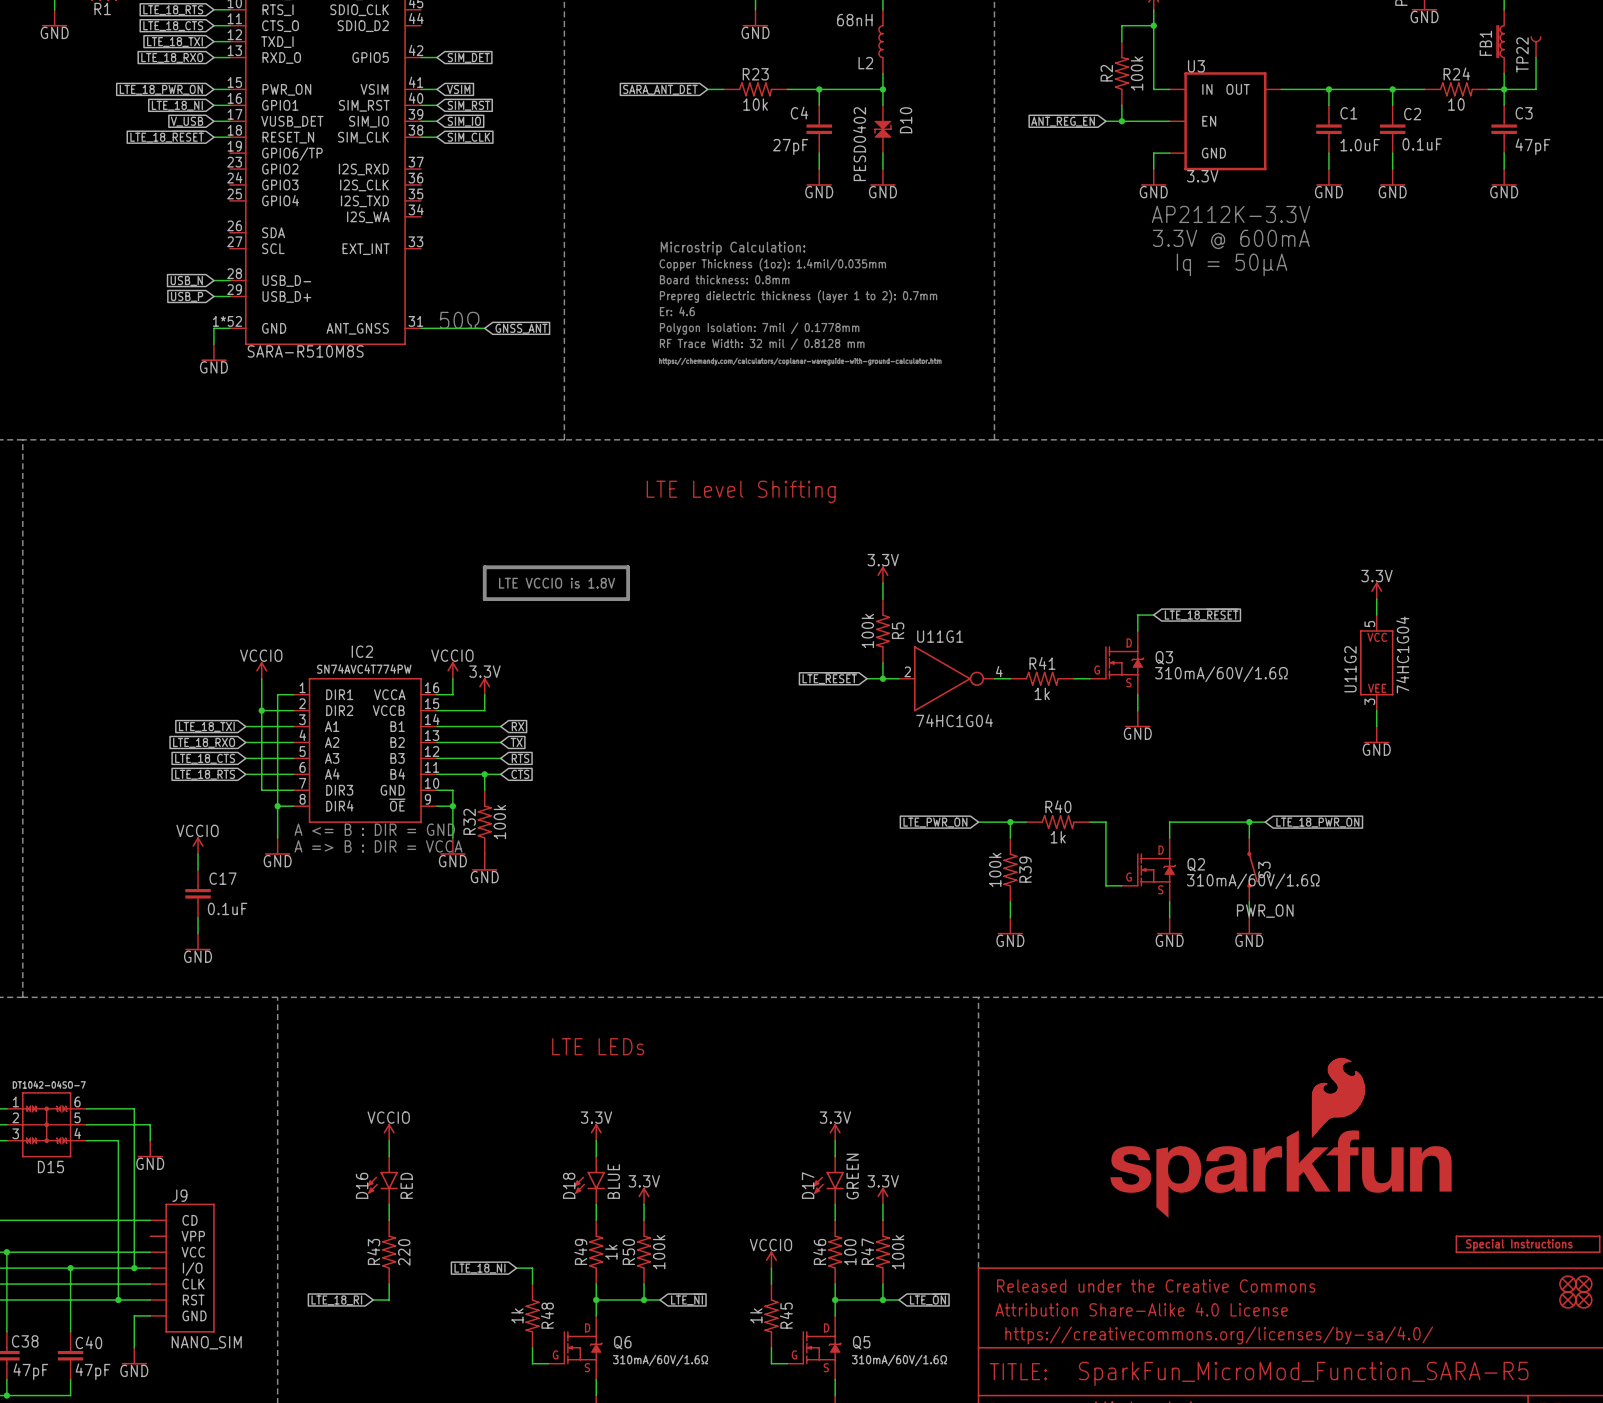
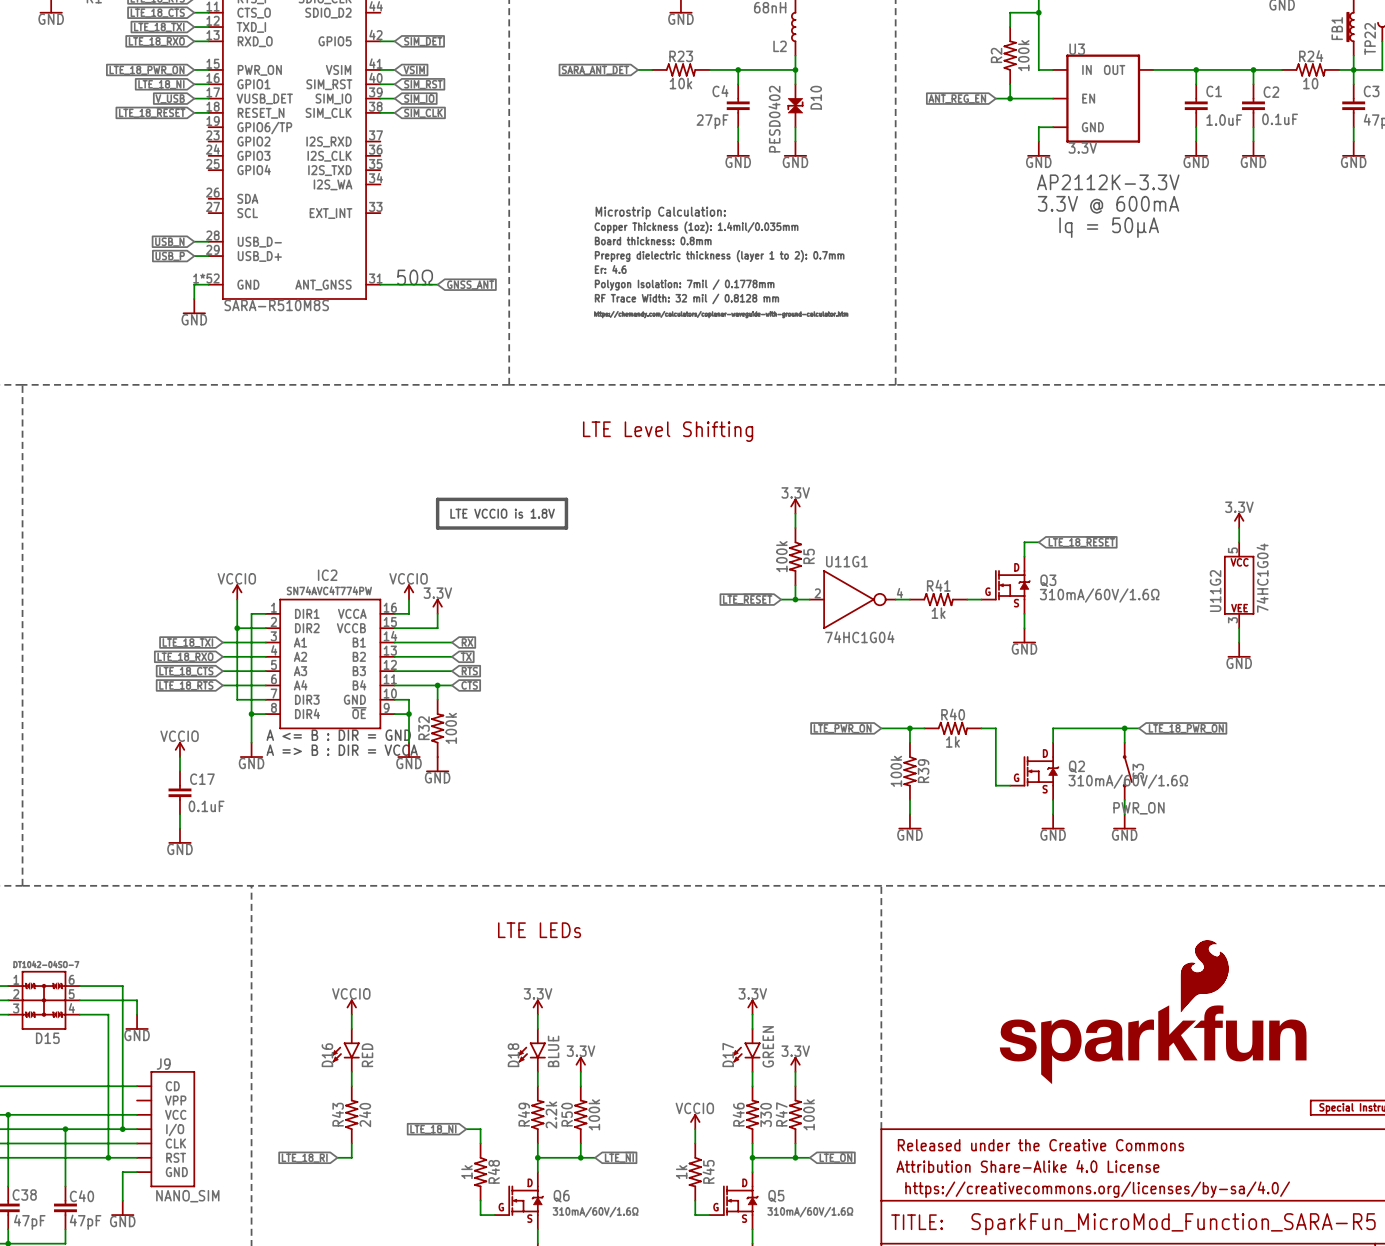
R43 value: 220 (404, 1252) -> 240 (365, 1115)
R49 value: 1k (611, 1252) -> 2.2k (551, 1115)
R46 value: 100 (850, 1252) -> 330 (766, 1115)

